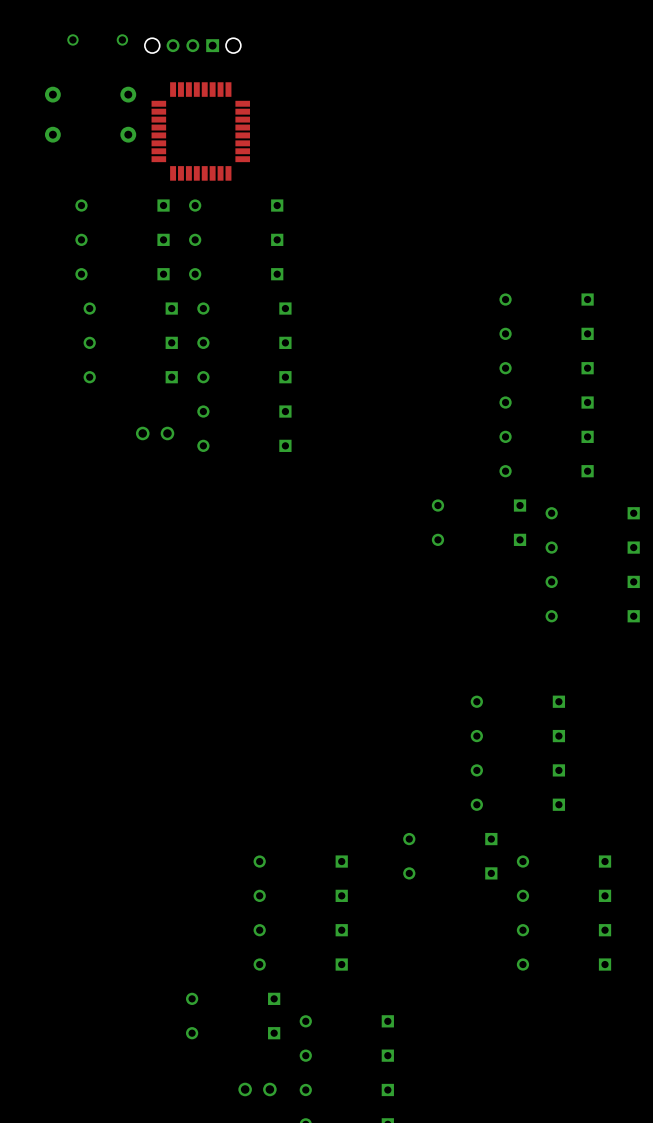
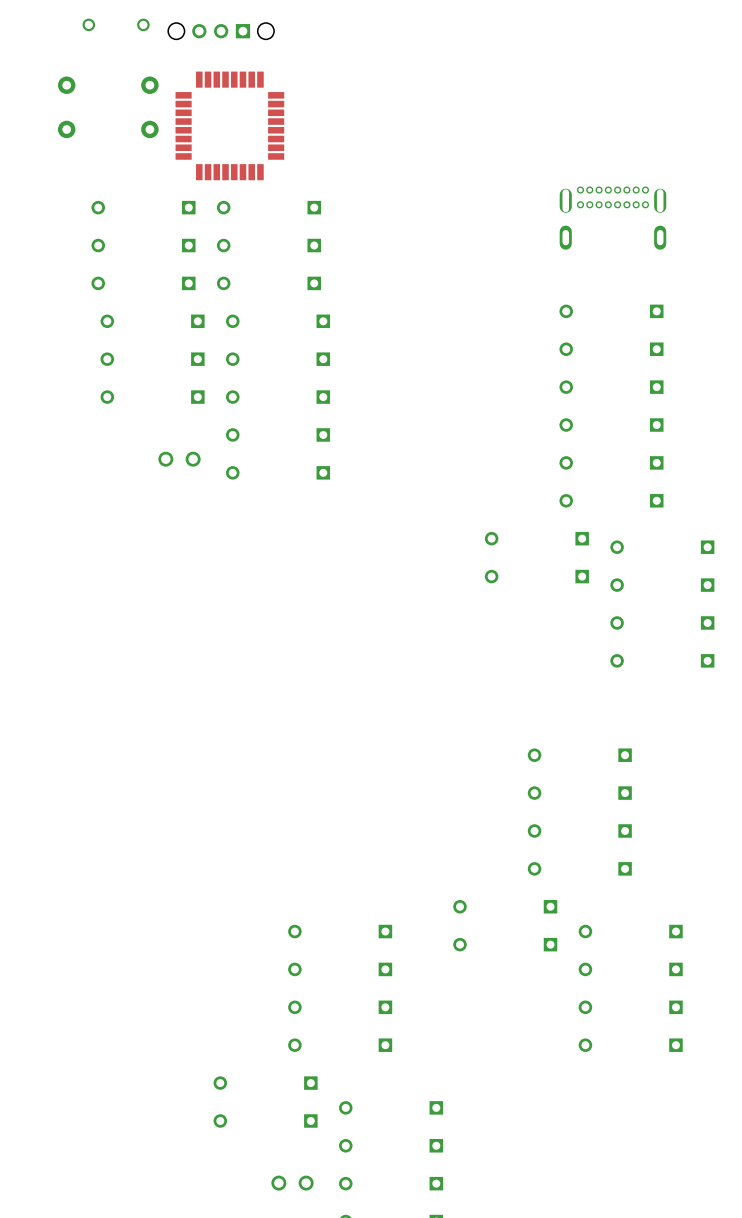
part: none -> (612, 218)

